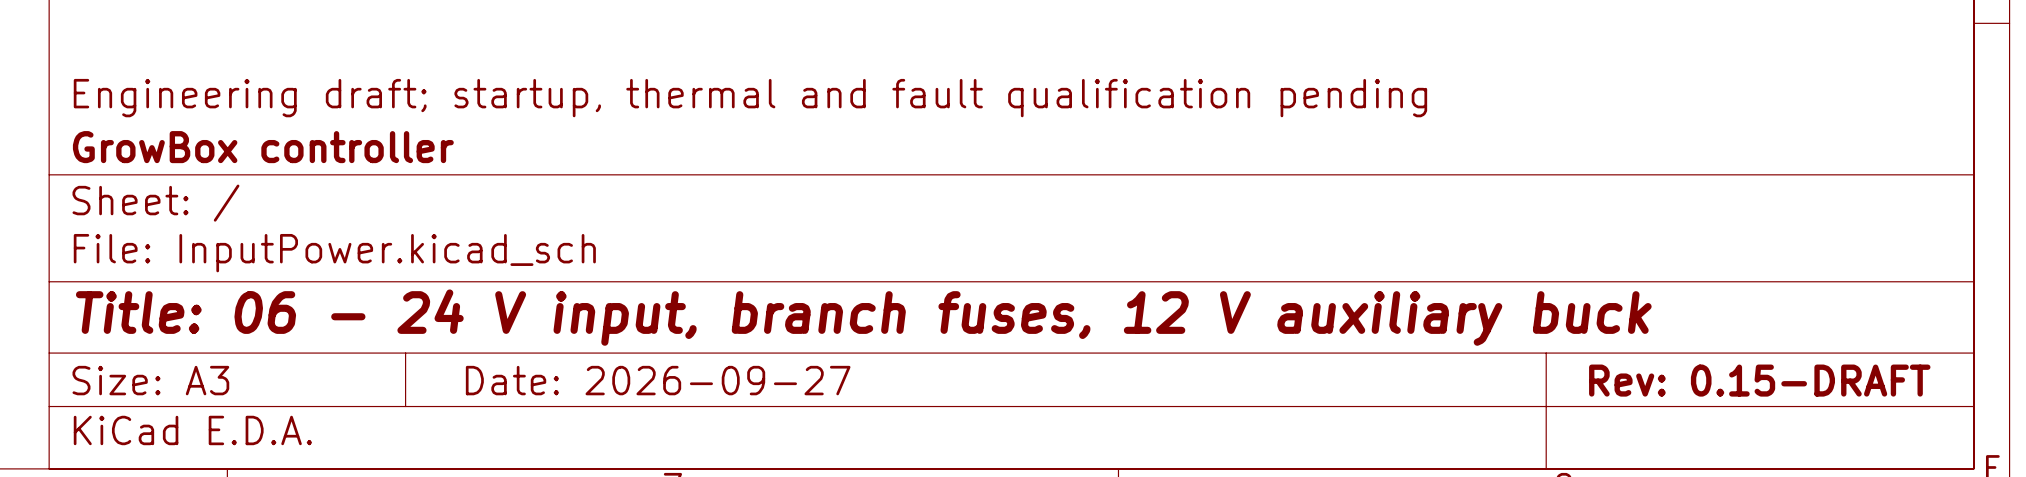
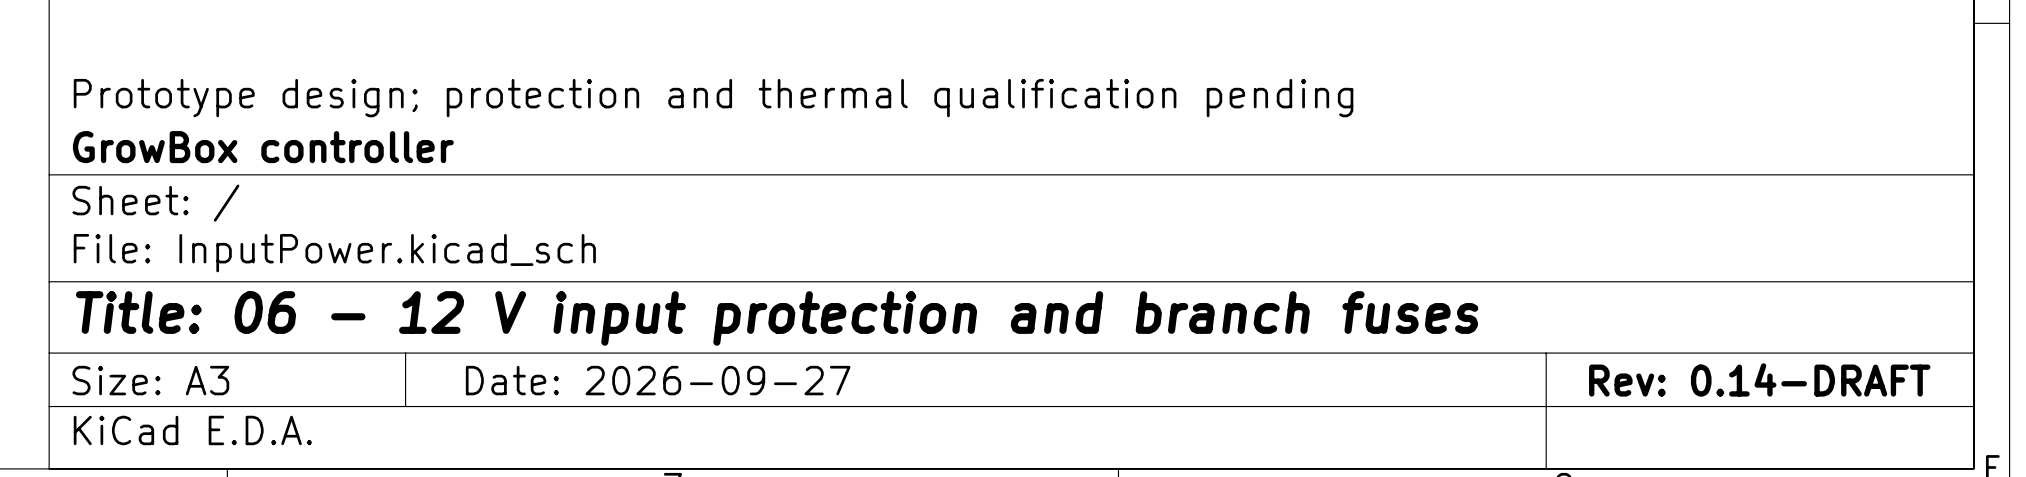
title block: Engineering draft; startup, thermal and fault qualification pending (750, 98) -> Prototype design; protection and thermal qualification pending (713, 98)
title block: Title: 06 - 24 V input, branch fuses, 12 V auxiliary buck (863, 317) -> Title: 06 - 12 V input protection and branch fuses (777, 318)
title block: Rev: 0.15-DRAFT (1759, 380) -> Rev: 0.14-DRAFT (1759, 379)

